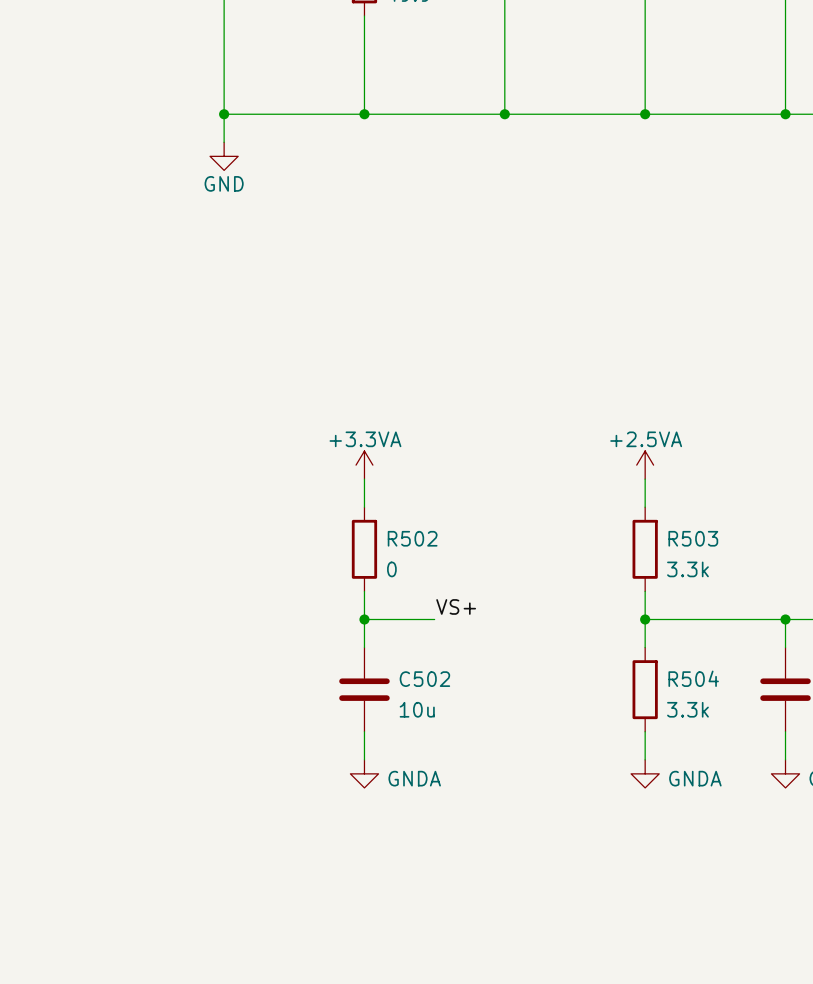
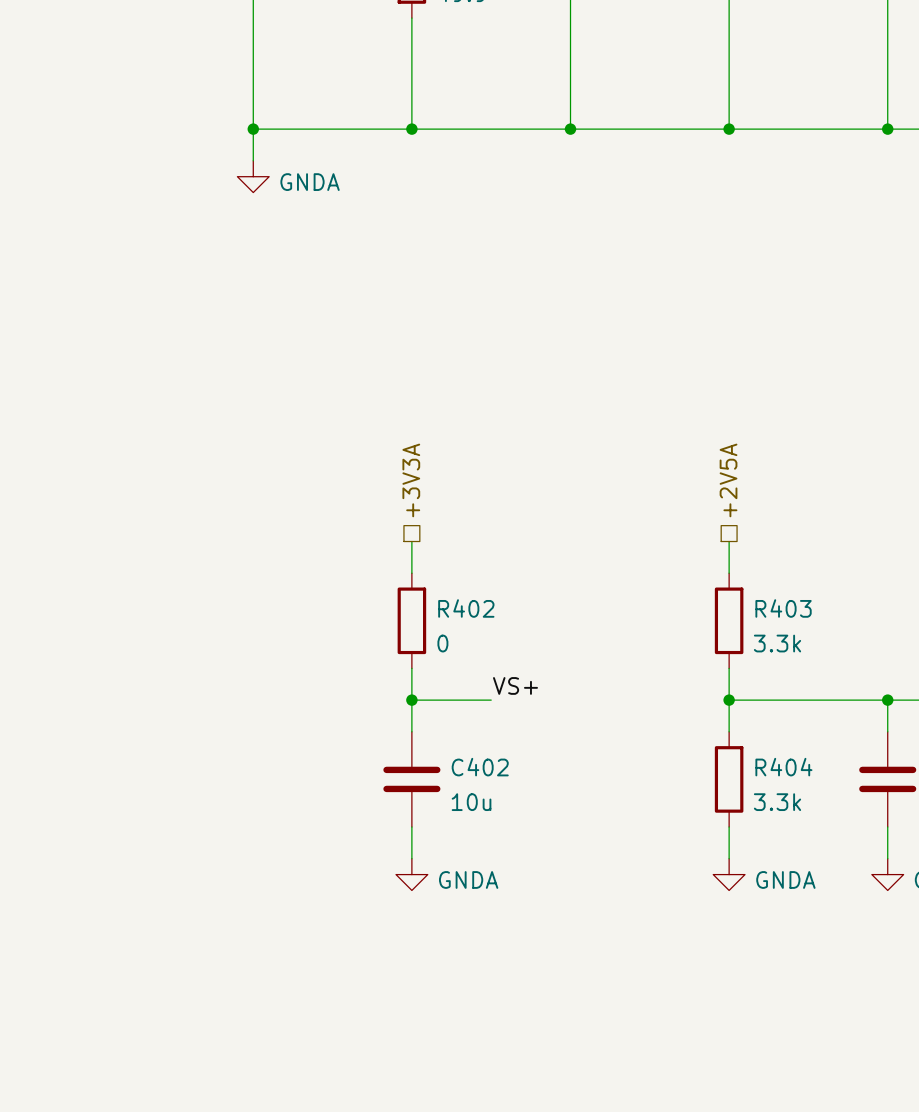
power symbol: GND (224, 156) -> GNDA (253, 176)
hierarchical label: none -> +3V3A (411, 480)
hierarchical label: none -> +2V5A (728, 480)
power symbol: +3.3VA (364, 465) -> none
power symbol: +2.5VA (645, 465) -> none
R502 name: R502 (412, 538) -> R402 (466, 608)
R503 name: R503 (693, 538) -> R403 (783, 608)
R504 name: R504 (693, 678) -> R404 (783, 767)
C502 name: C502 (424, 679) -> C402 (480, 767)

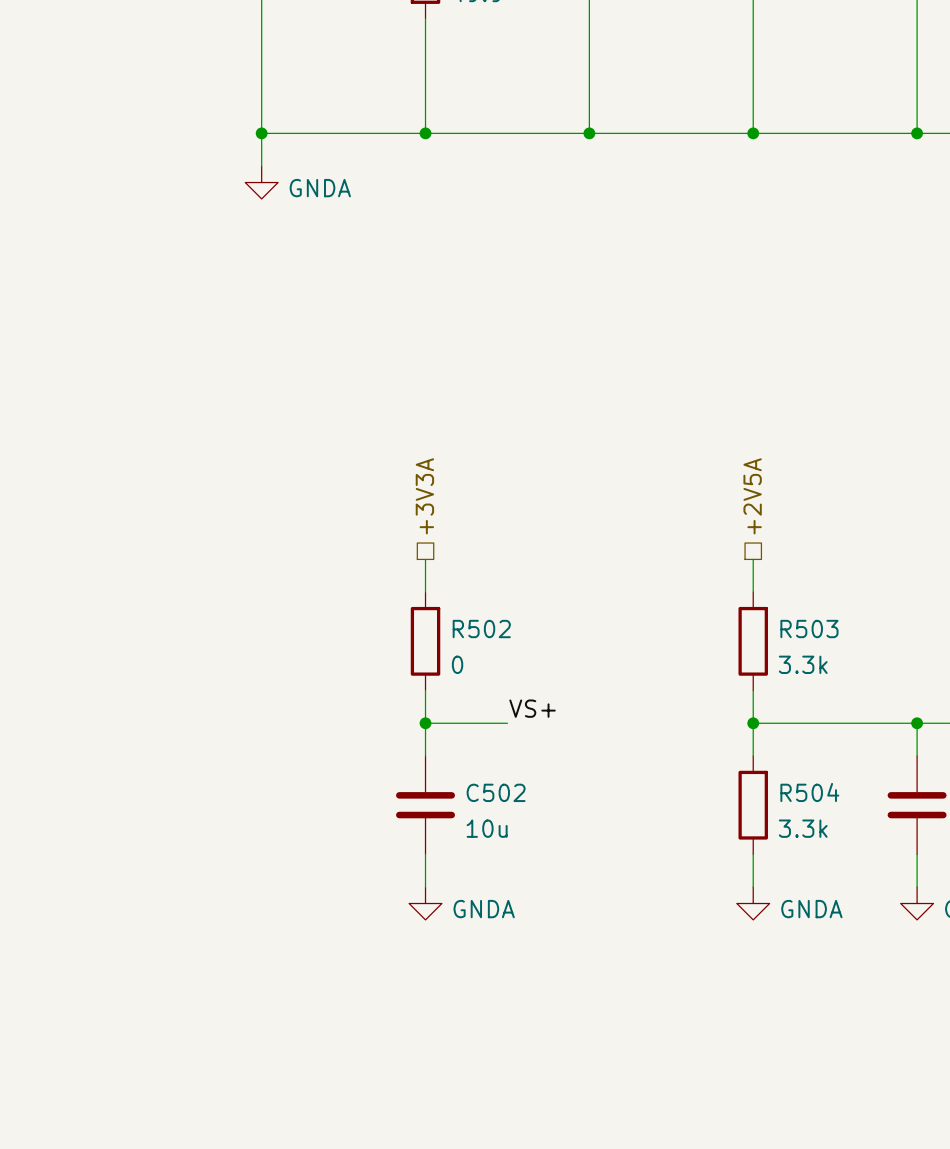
R402 name: R402 (466, 608) -> R502 (481, 629)
R403 name: R403 (783, 608) -> R503 (809, 629)
C402 name: C402 (480, 767) -> C502 (496, 792)
R404 name: R404 (783, 767) -> R504 (809, 792)

